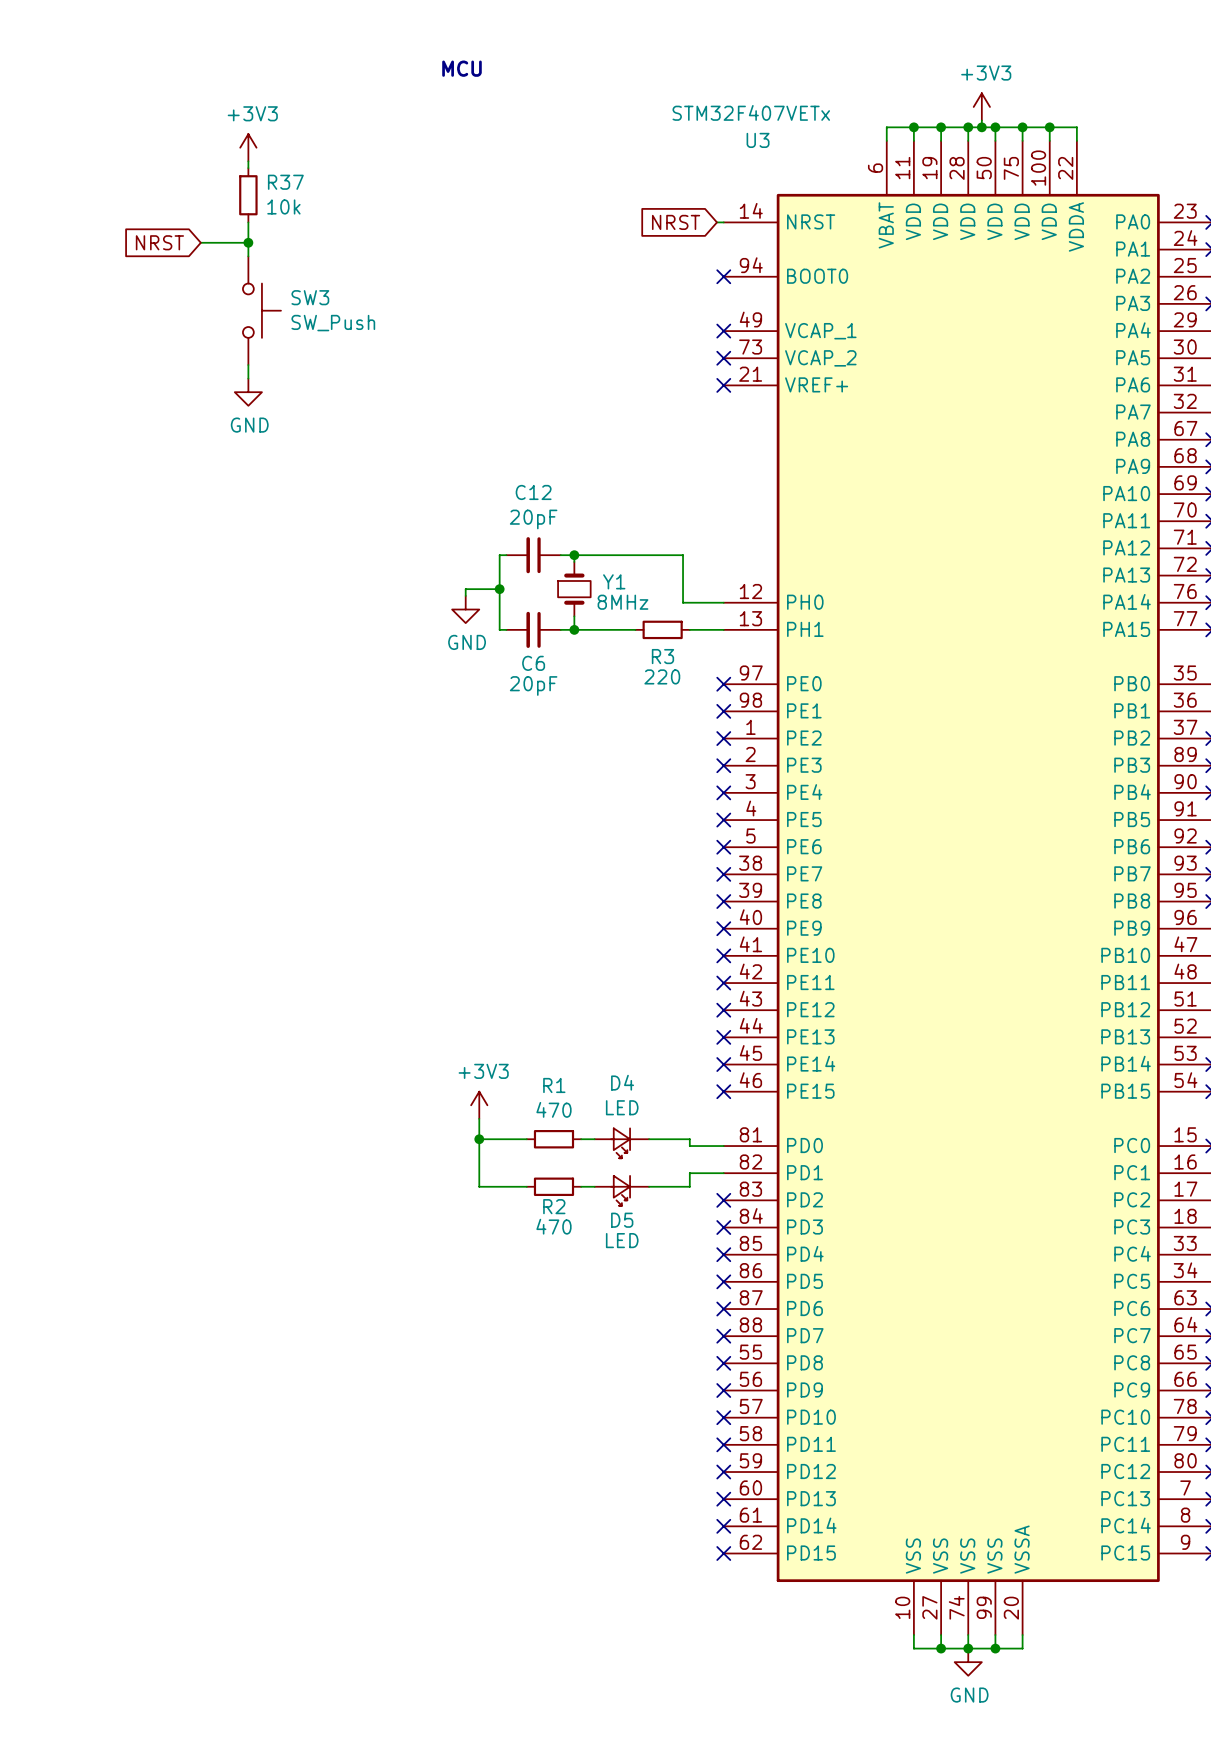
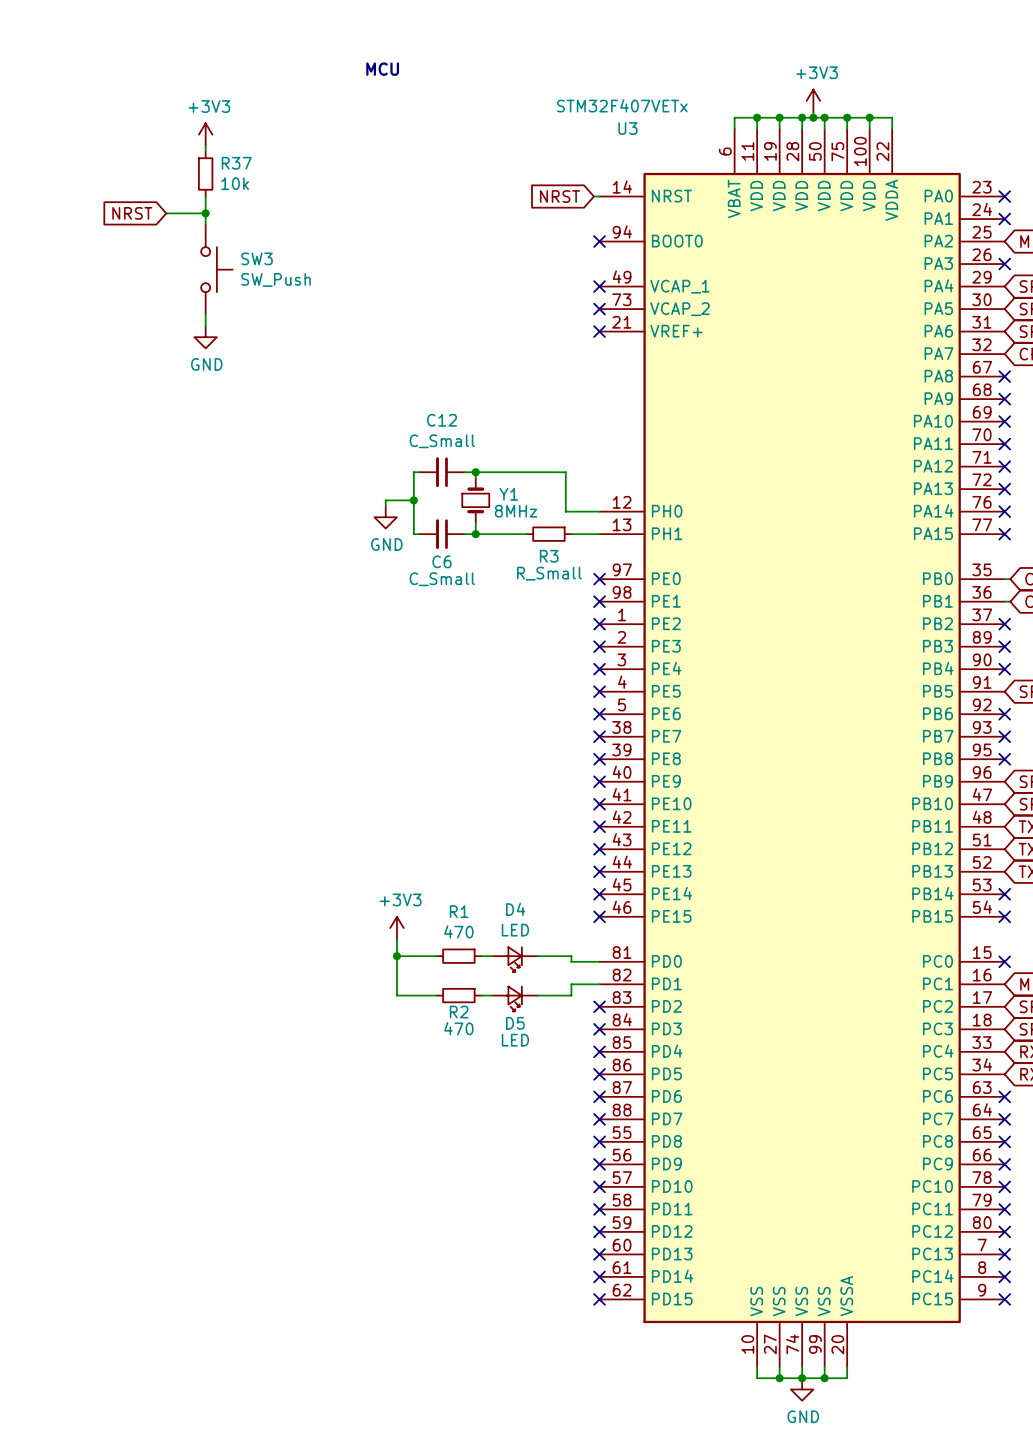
C12 value: 20pF (533, 519) -> C_Small (442, 441)
R3 value: 220 (662, 676) -> R_Small (549, 573)
C6 value: 20pF (533, 685) -> C_Small (442, 579)

